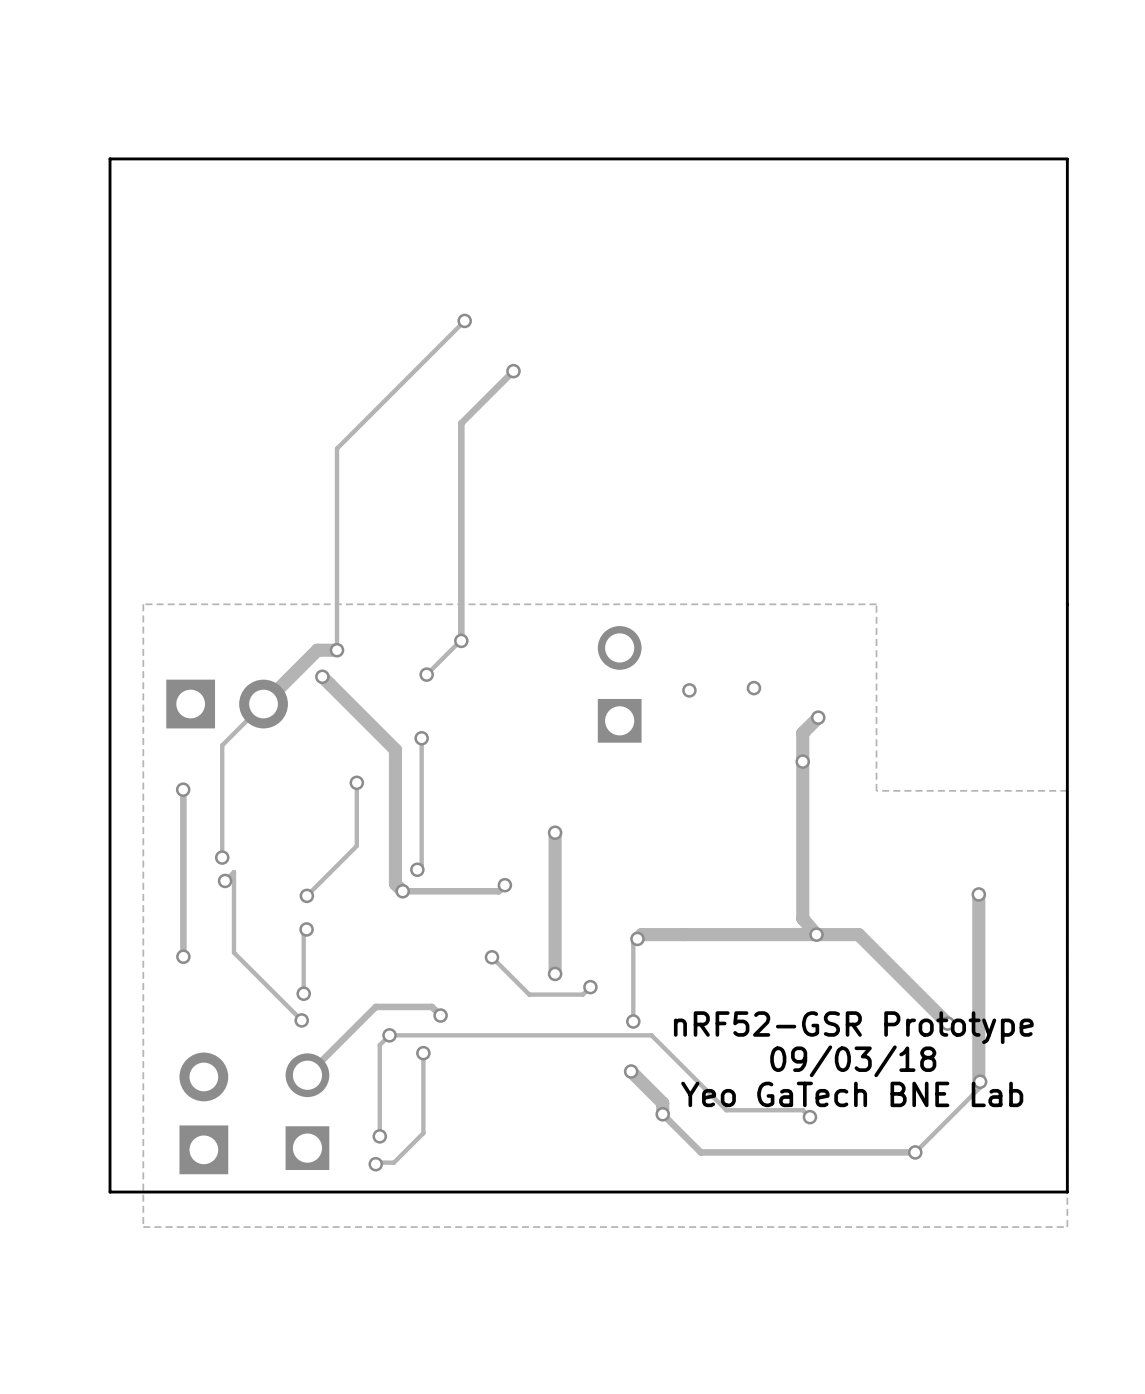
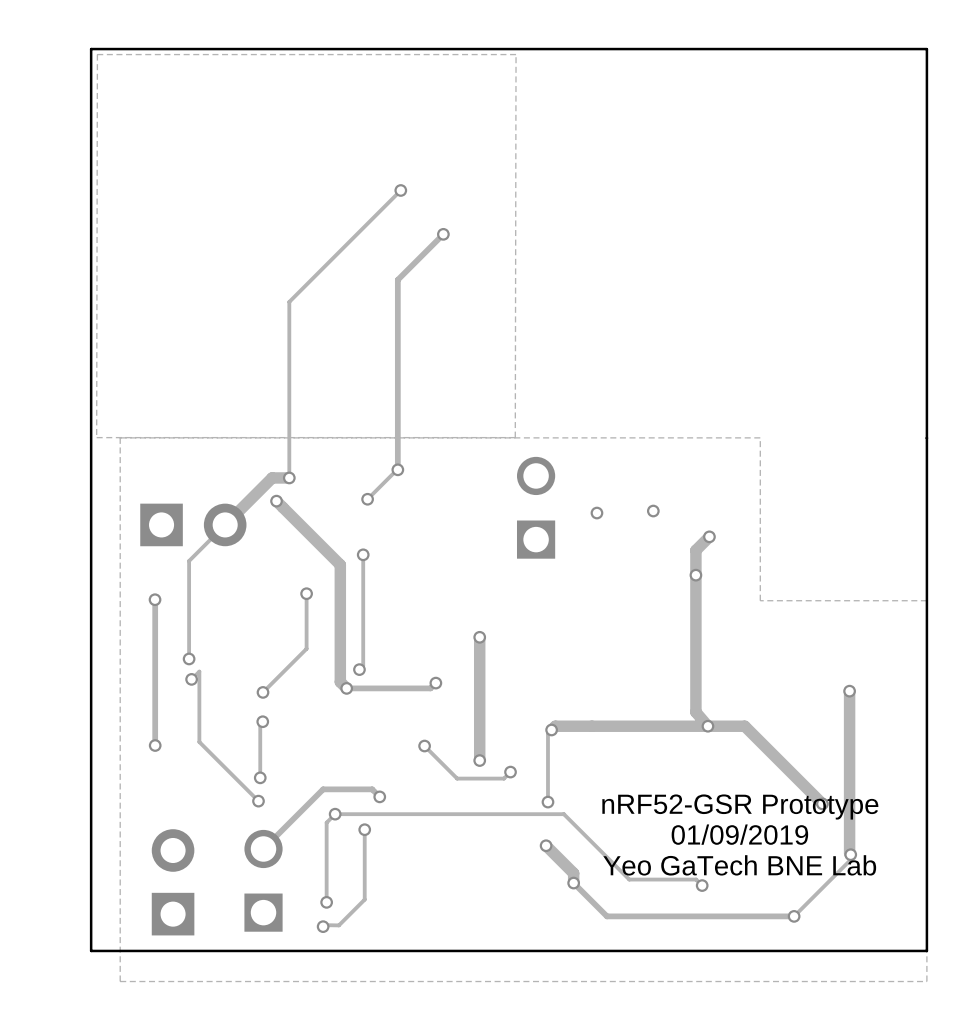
zone outline: none -> (516, 54) (97, 54) (96, 437) (515, 437) (516, 54)
text: 09/03/18 (853, 1061) -> 01/09/2019 (739, 834)

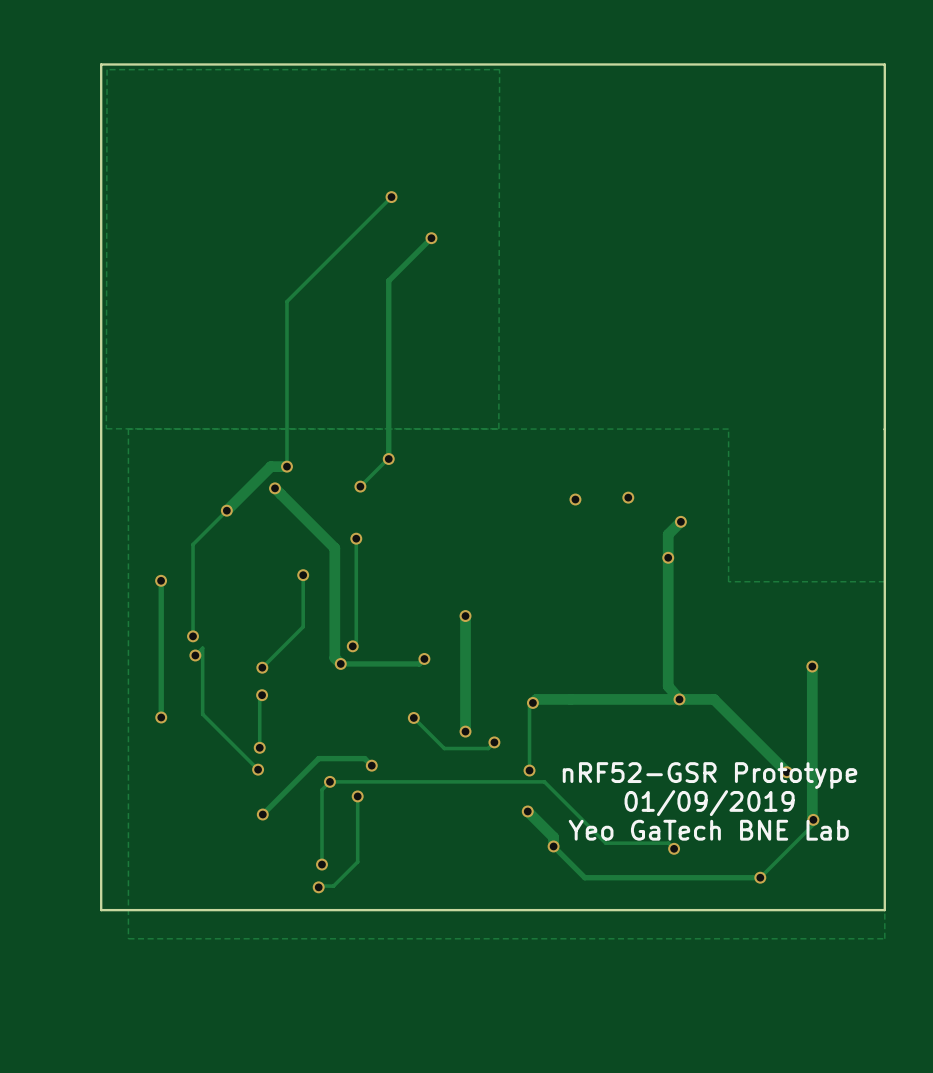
part: (536, 507) -> none
part: (193, 524) -> none
via: none -> (226, 510)
via: none -> (262, 814)
part: (263, 880) -> none
part: (173, 882) -> none

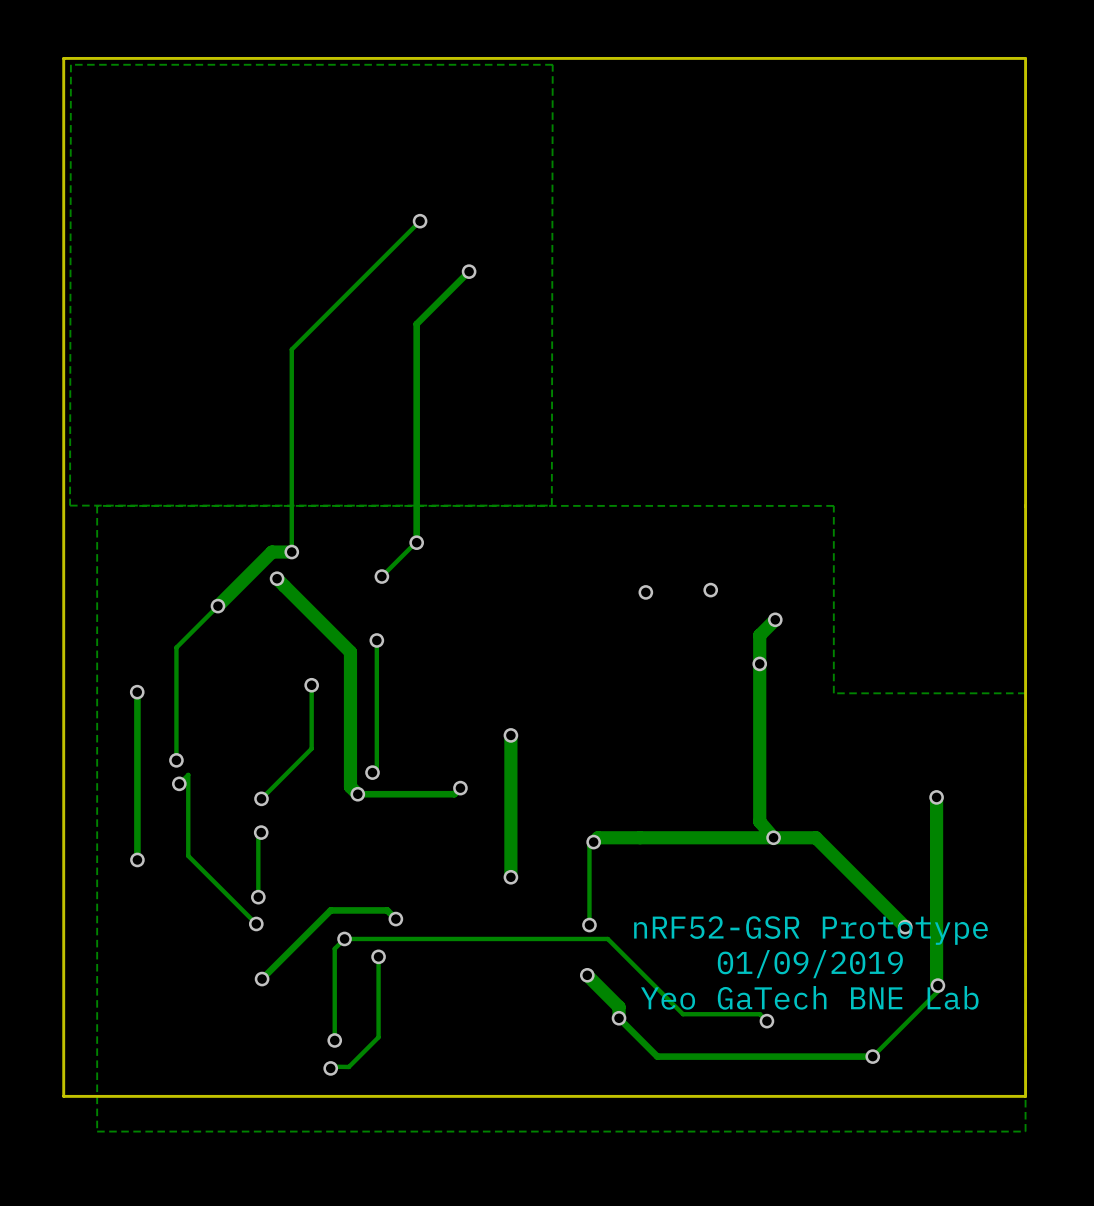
track: (413, 717) (444, 748) (488, 748) (494, 742) -> none
via: (413, 717) -> none
via: (494, 742) -> none

